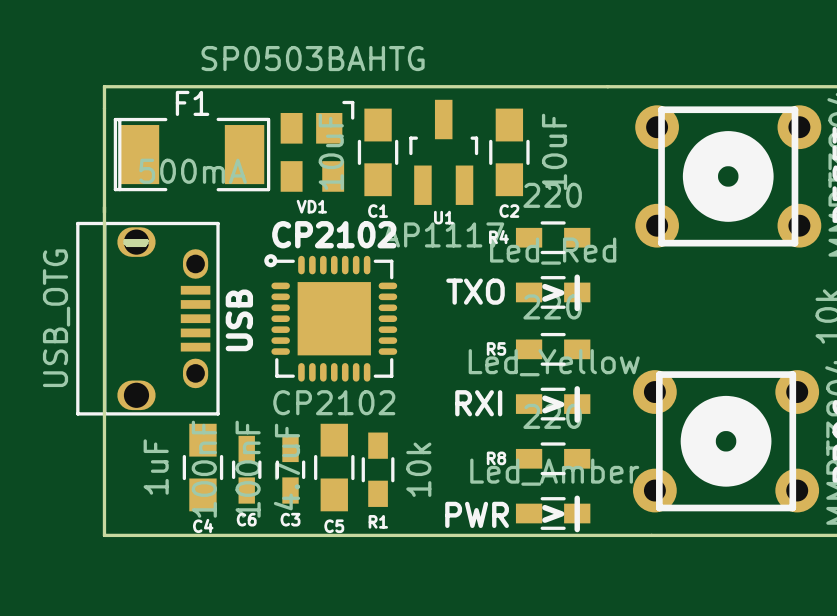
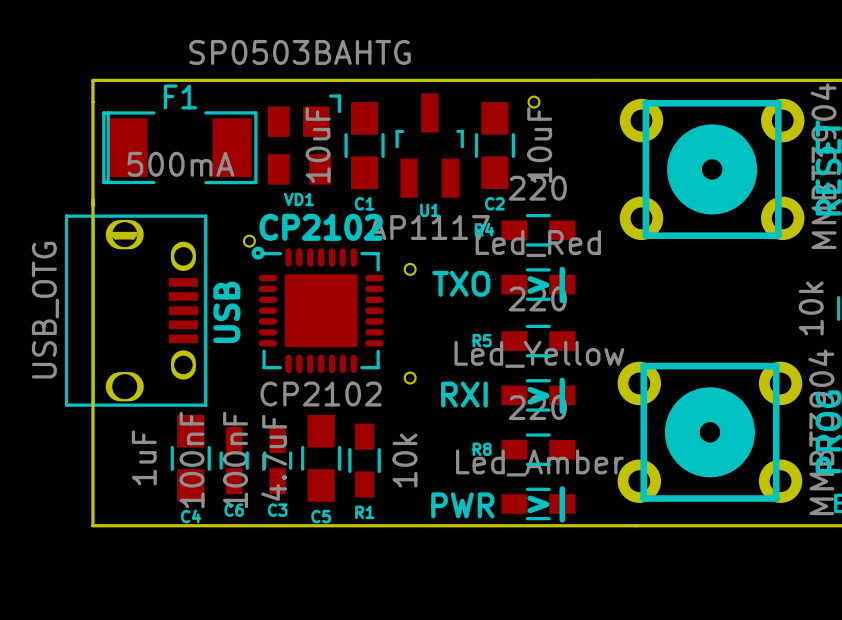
part: none -> (533, 102)
part: none -> (249, 241)
part: none -> (410, 269)
part: none -> (410, 378)

